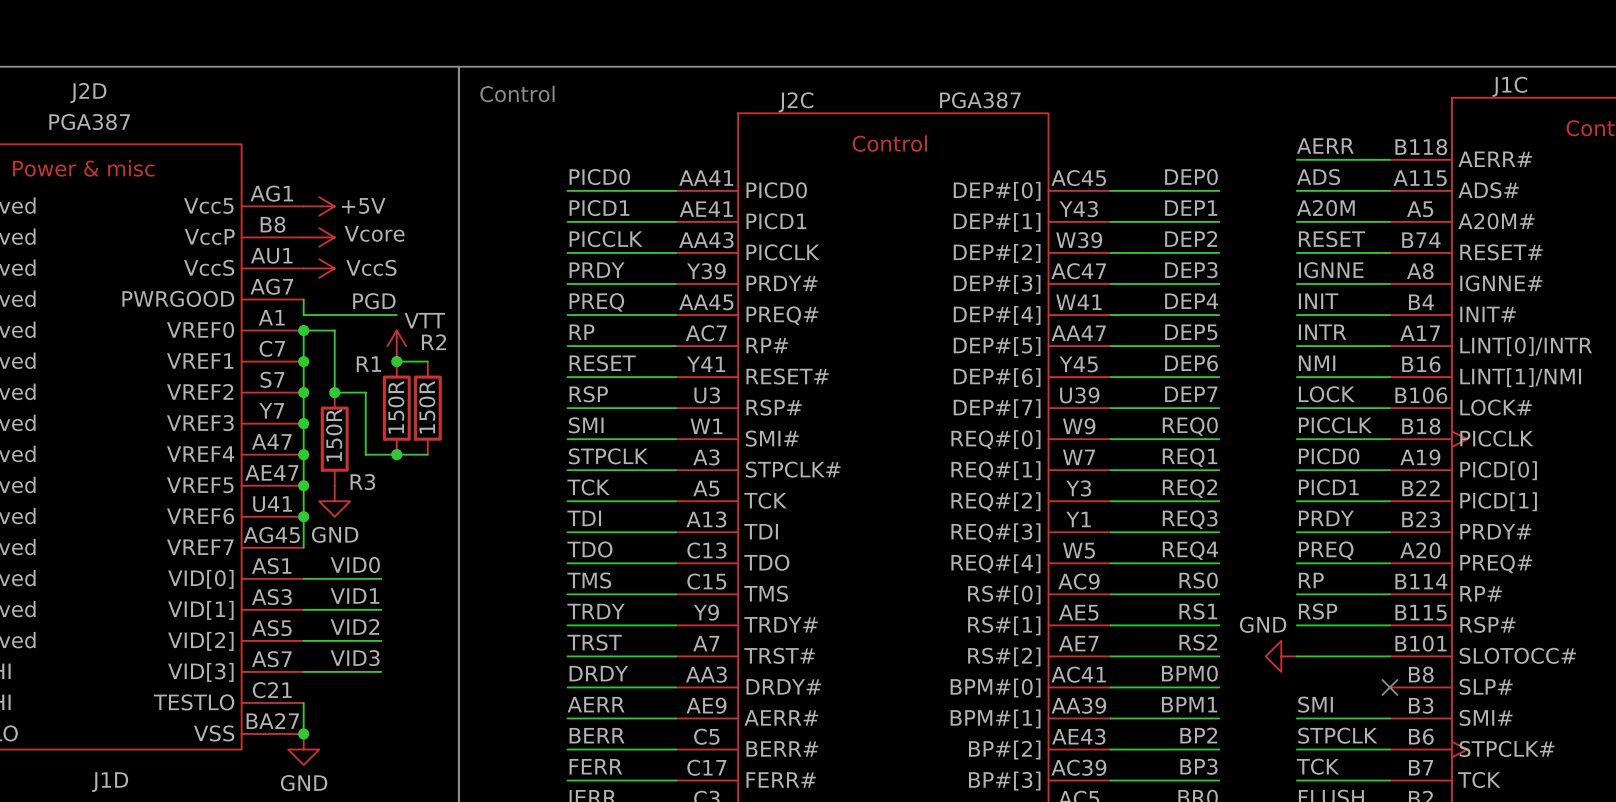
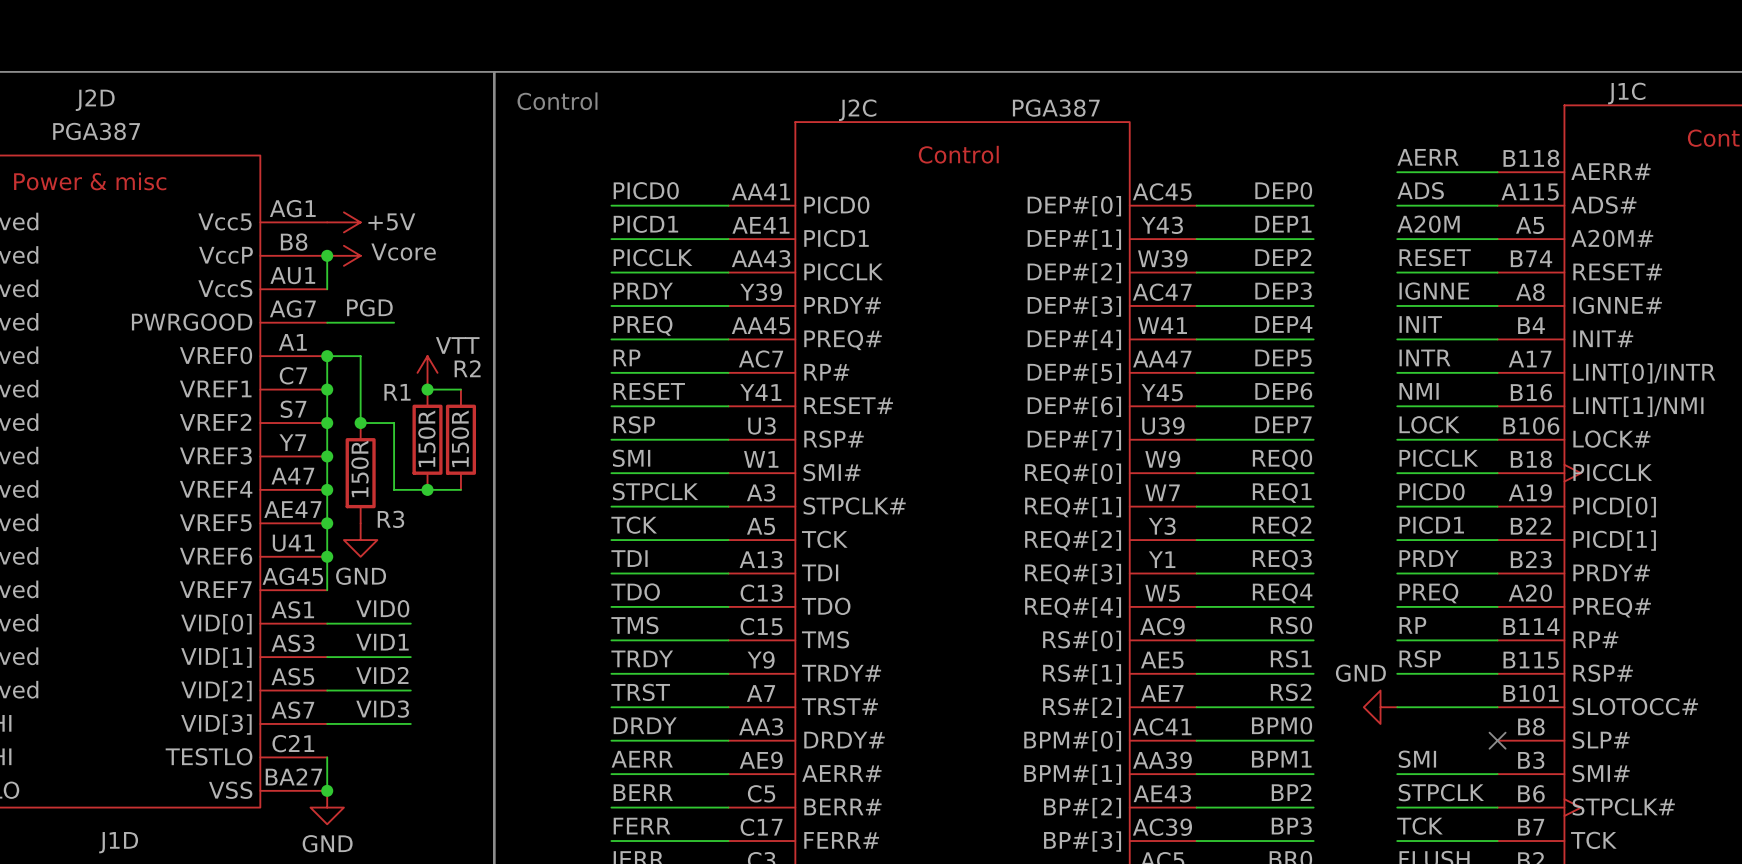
wire: none -> (327, 255) (327, 289)
junction: none -> (327, 255)
power symbol: VccS (319, 268) -> none
wire: (303, 299) (303, 315) (396, 315) -> (327, 322) (394, 322)
label position: PGD (374, 301) -> PGD (369, 307)

